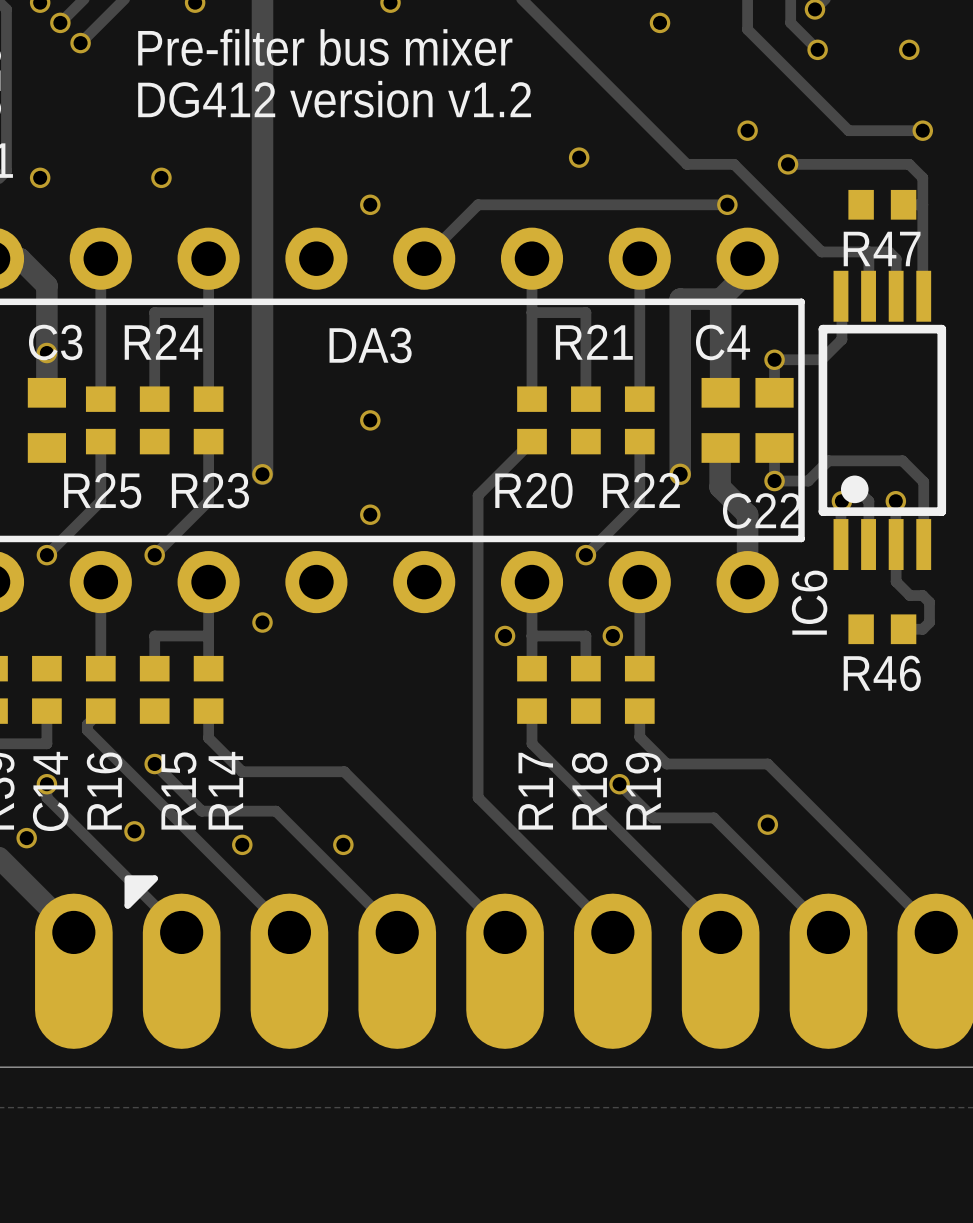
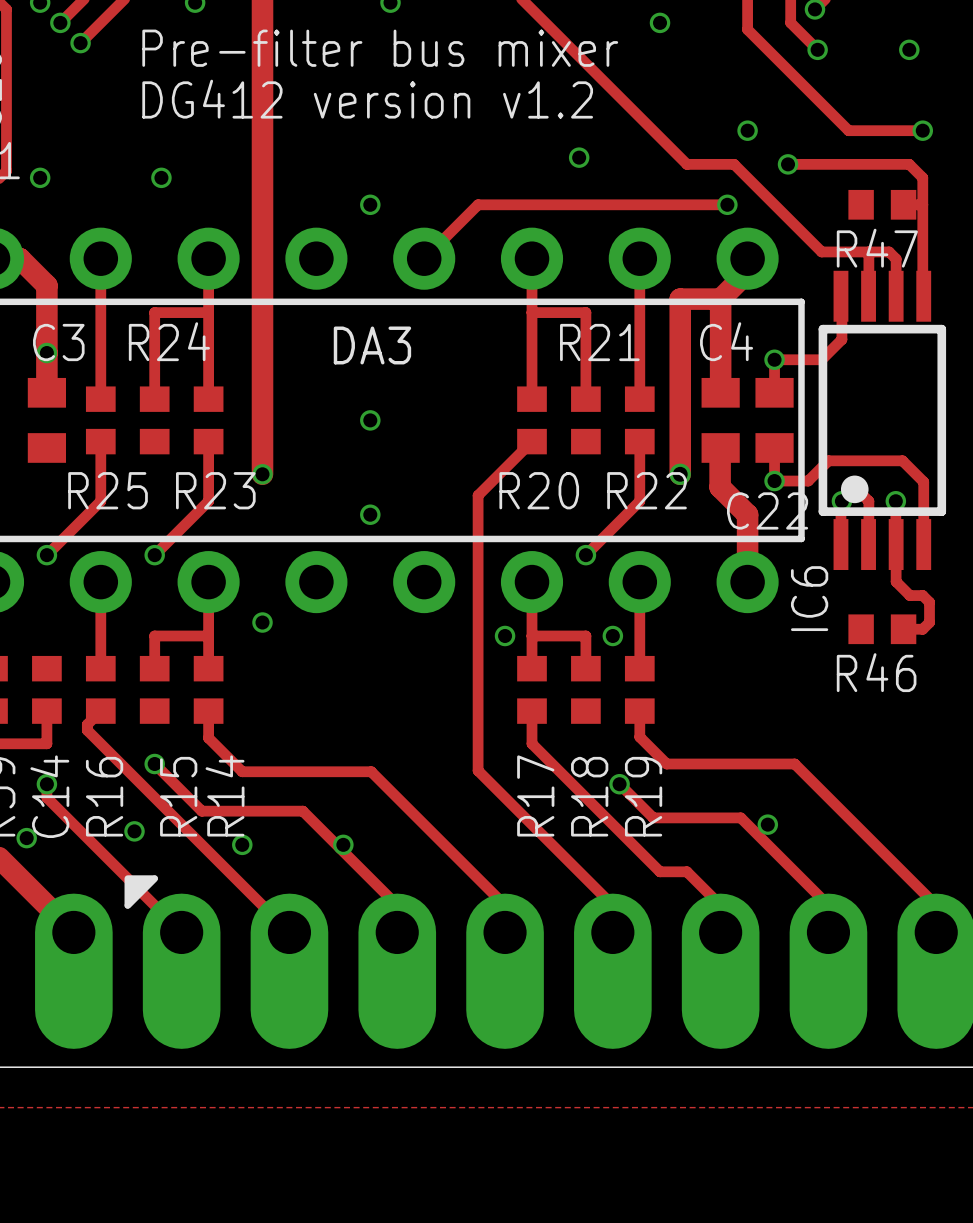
track: (767, 764) (936, 932) -> (767, 764) (794, 764) (963, 932)
track: (478, 770) (478, 797) (612, 932) -> (478, 770) (639, 932)
track: (344, 771) (505, 932) -> (344, 771) (371, 771) (532, 932)
track: (275, 811) (397, 932) -> (275, 811) (302, 811) (424, 932)
track: (713, 817) (828, 932) -> (713, 817) (740, 817) (855, 932)
track: (660, 871) (720, 932) -> (660, 871) (686, 871) (747, 932)

